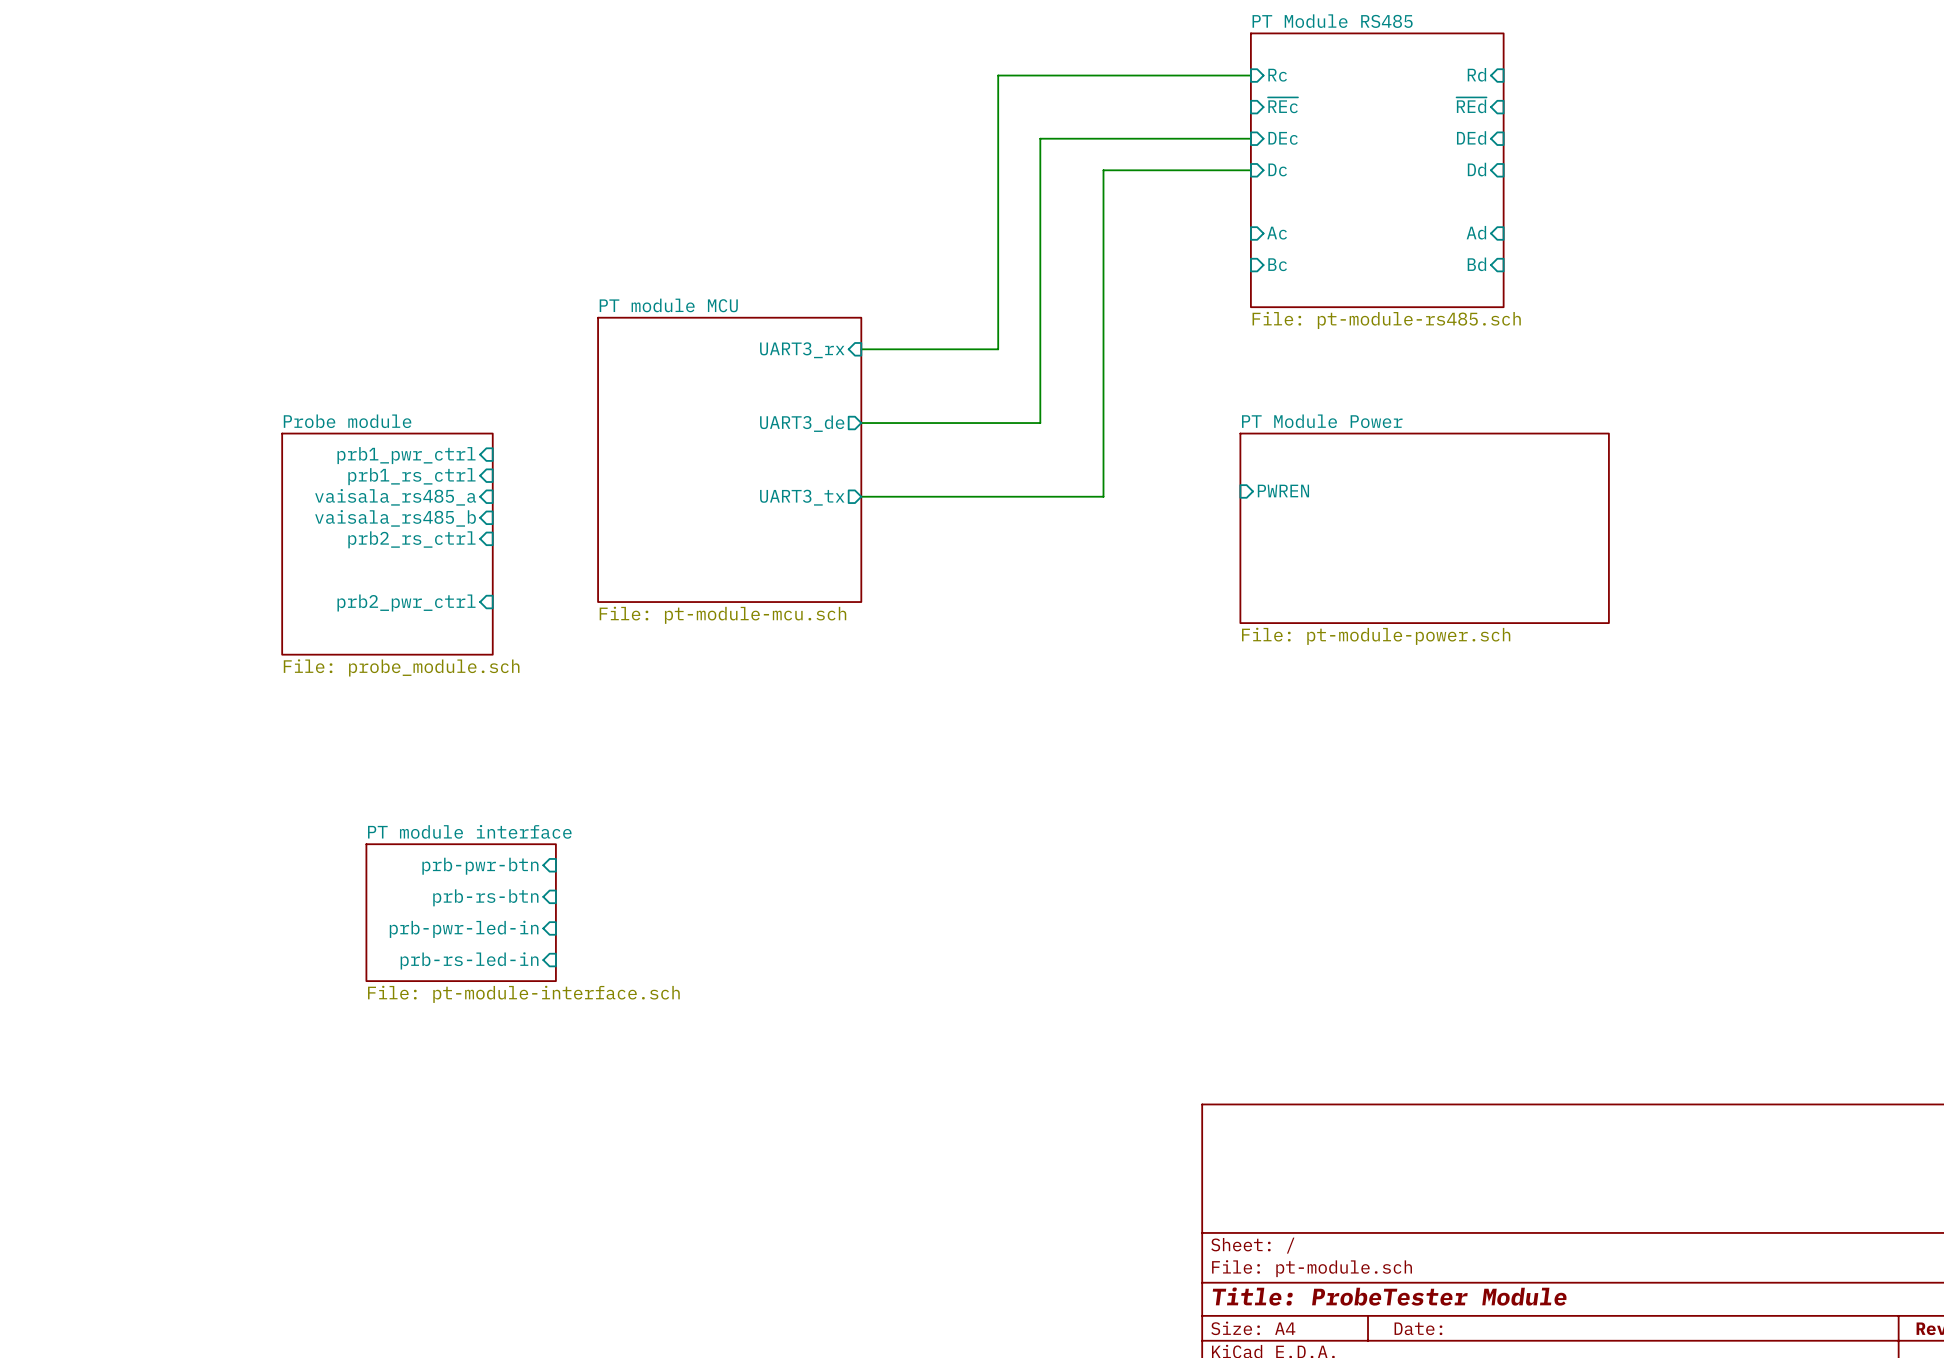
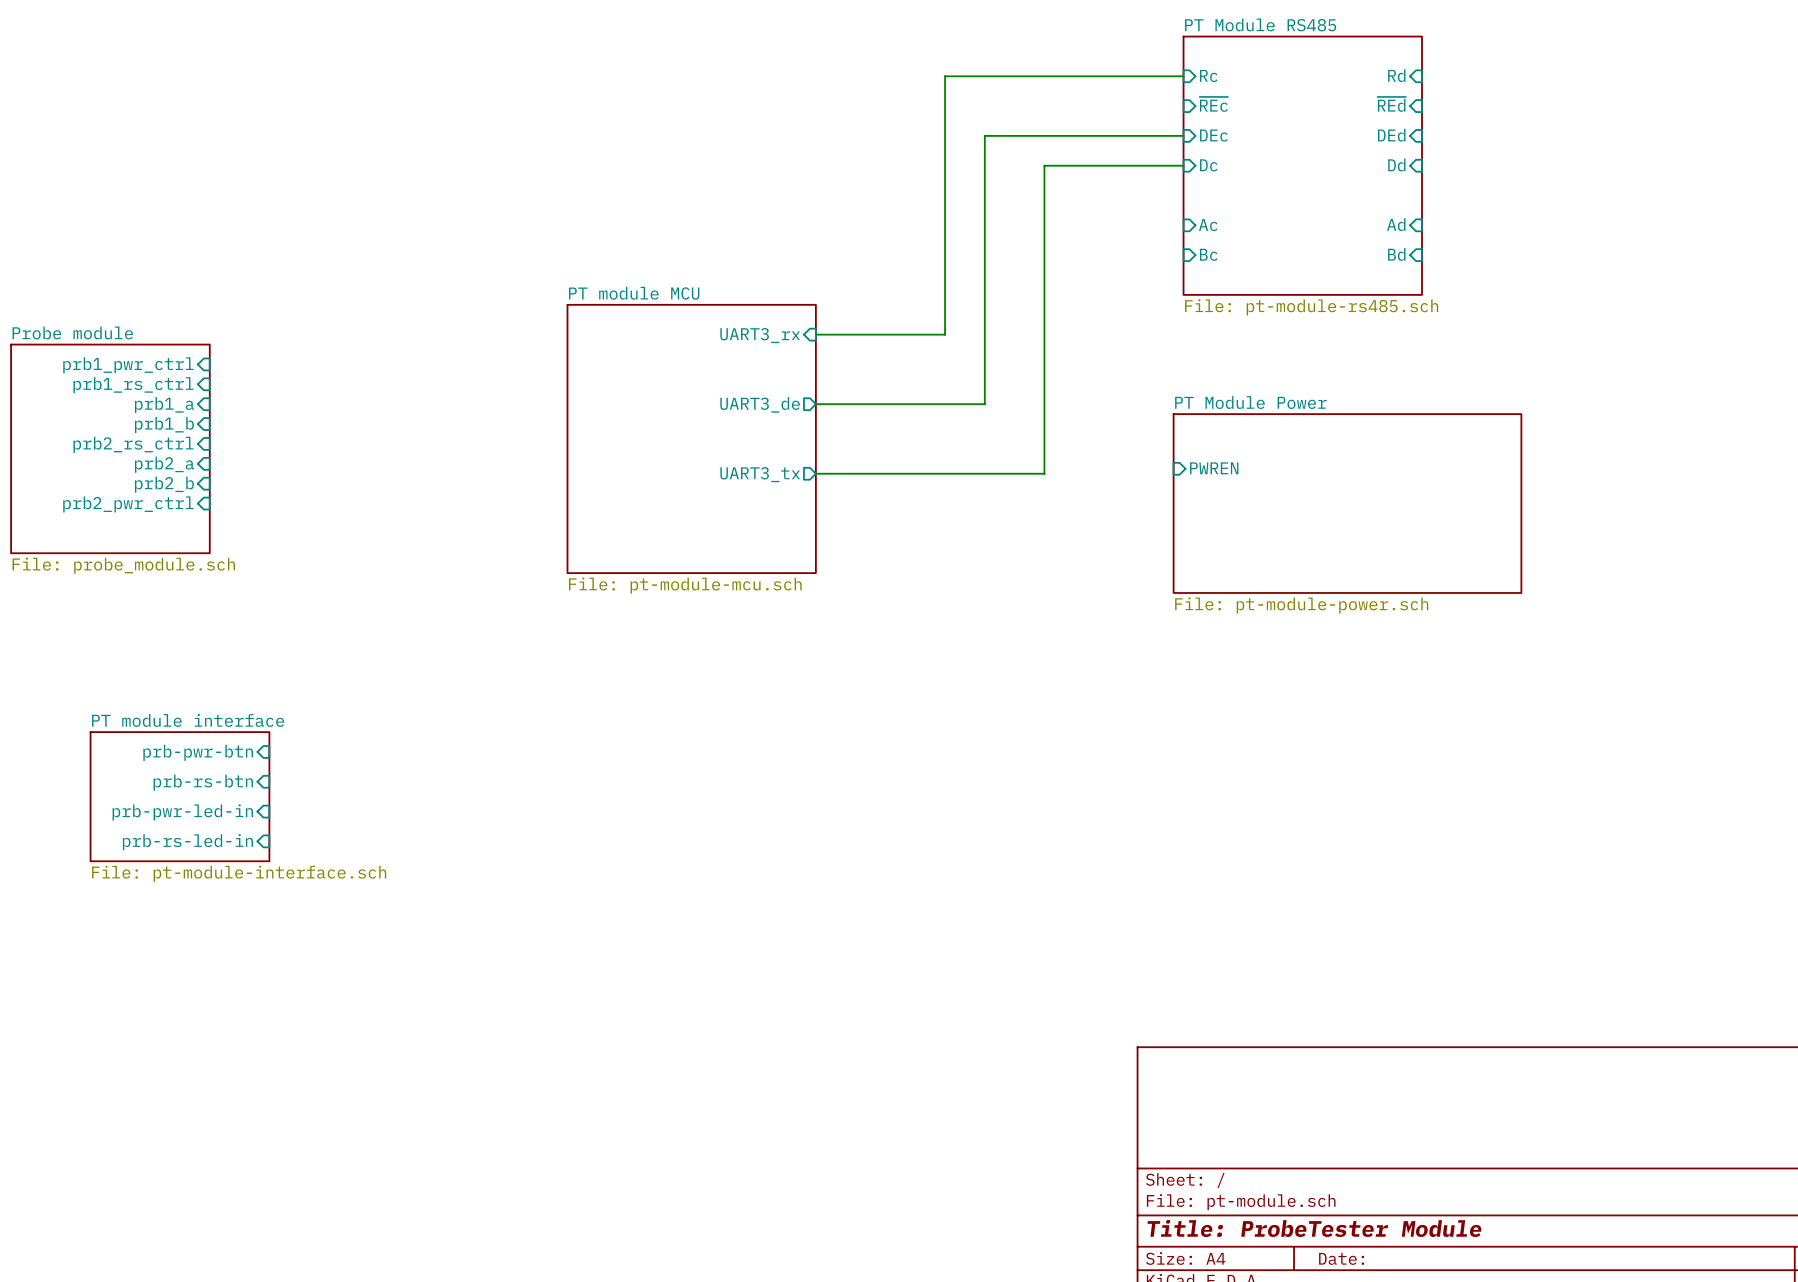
sheet pin: none -> prb1_pwr_ctrl (128, 365)
sheet pin: none -> prb1_rs_ctrl (133, 385)
sheet pin: none -> prb1_a (164, 405)
sheet pin: none -> prb1_b (164, 424)
sheet pin: prb1_pwr_ctrl (406, 455) -> none
sheet pin: none -> prb2_rs_ctrl (133, 444)
sheet Probe module: none -> File: probe_module.sch (110, 448)
sheet pin: prb1_rs_ctrl (411, 476) -> none
sheet pin: none -> prb2_a (164, 464)
sheet pin: vaisala_rs485_a (395, 497) -> none
sheet pin: none -> prb2_b (164, 484)
sheet pin: vaisala_rs485_b (395, 518) -> none
sheet pin: none -> prb2_pwr_ctrl (128, 504)
sheet pin: prb2_rs_ctrl (411, 539) -> none
sheet Probe module: File: probe_module.sch (387, 544) -> none
sheet pin: prb2_pwr_ctrl (406, 602) -> none
sheet pin: none -> prb-pwr-btn (198, 752)
sheet pin: none -> prb-rs-btn (203, 782)
sheet PT module interface: none -> File: pt-module-interface.sch (179, 796)
sheet pin: none -> prb-pwr-led-in (182, 812)
sheet pin: prb-pwr-btn (480, 866) -> none
sheet pin: none -> prb-rs-led-in (187, 842)
sheet pin: prb-rs-btn (485, 897) -> none
sheet PT module interface: File: pt-module-interface.sch (461, 912) -> none
sheet pin: prb-pwr-led-in (464, 929) -> none
sheet pin: prb-rs-led-in (469, 960) -> none

